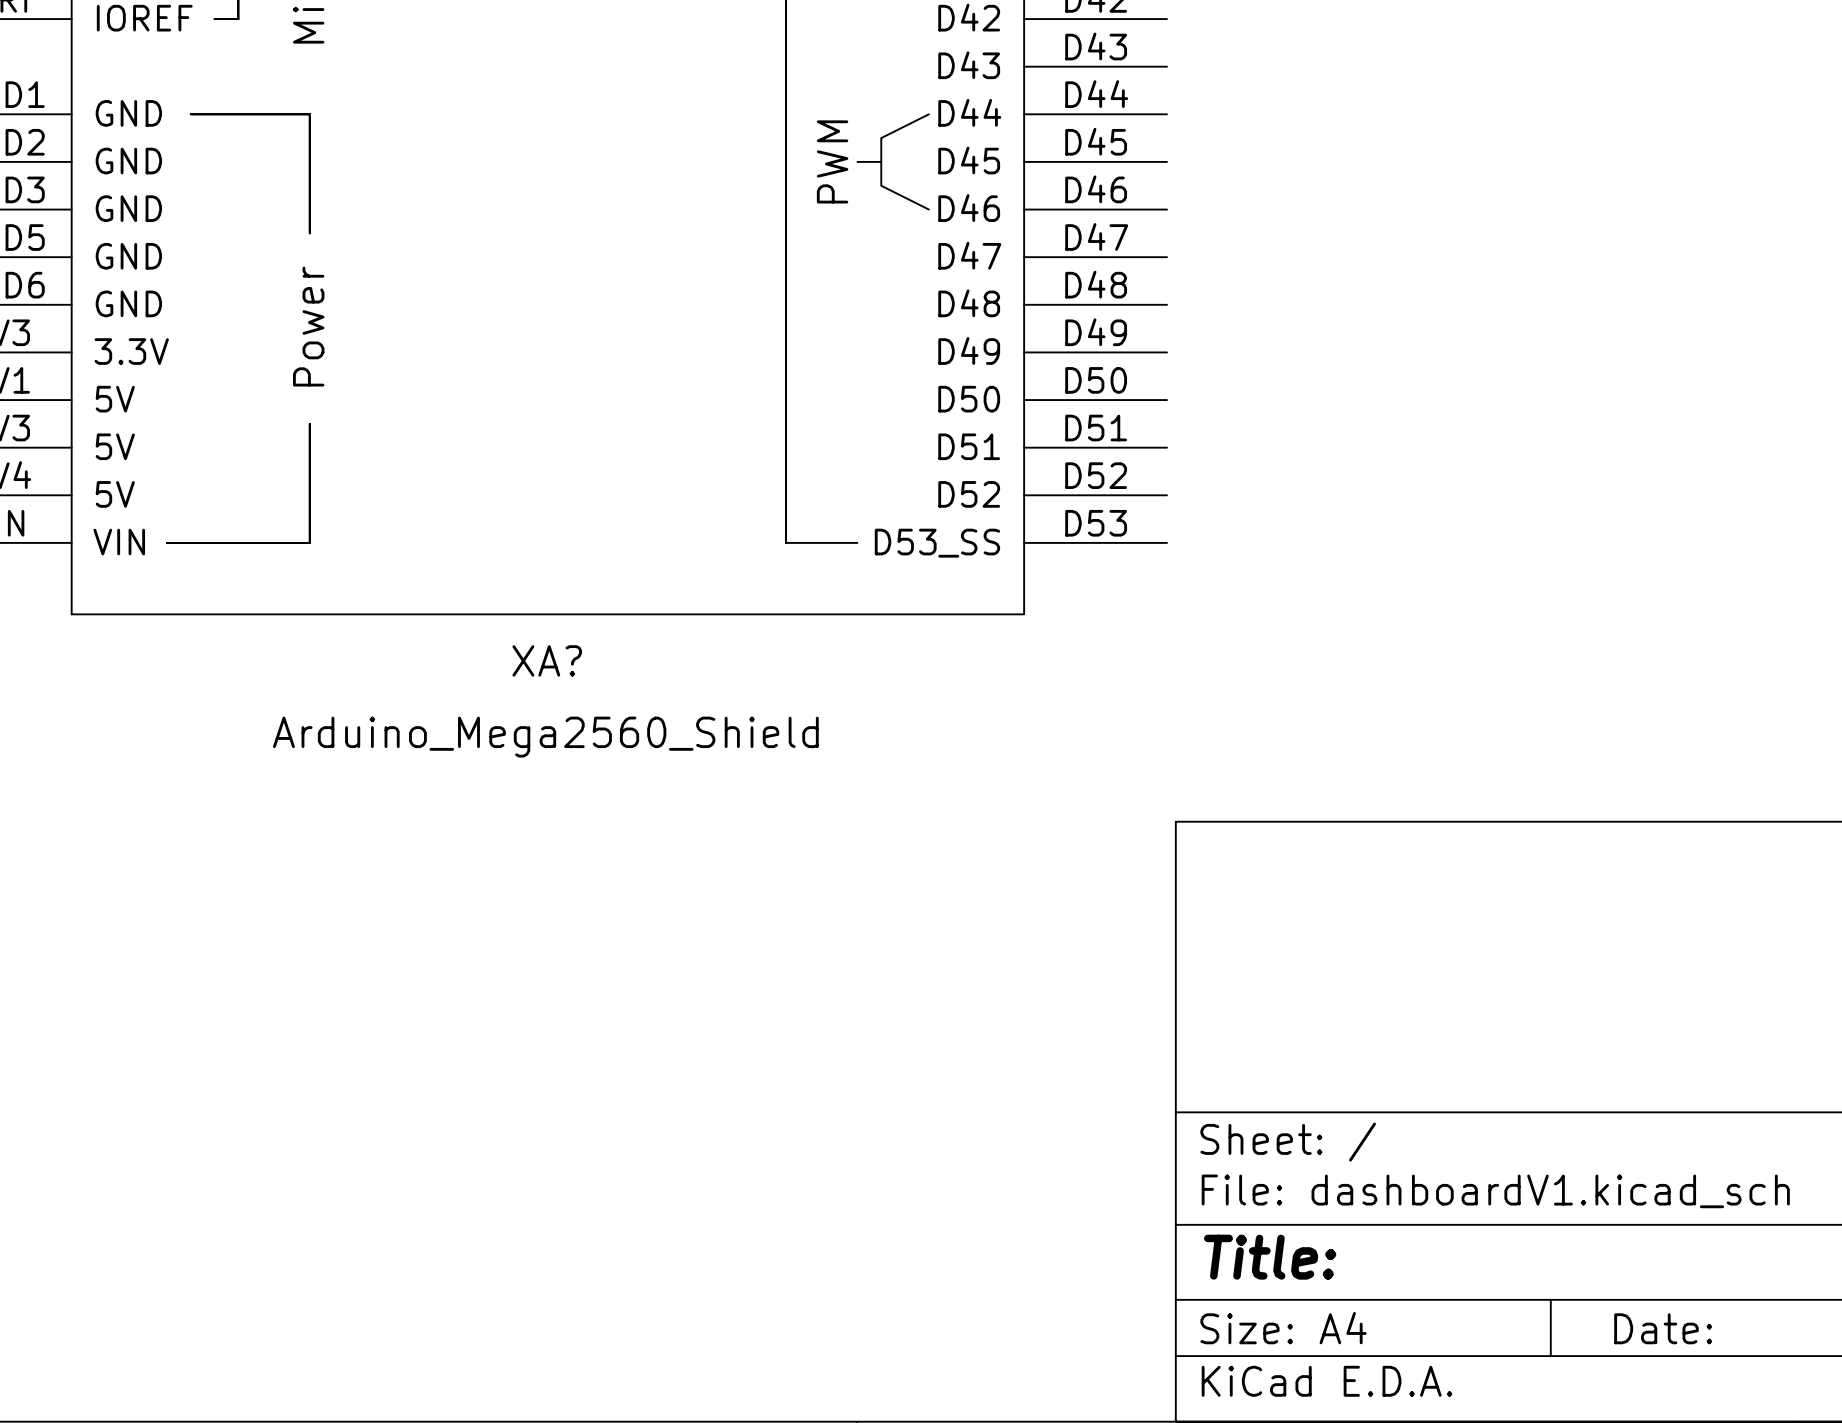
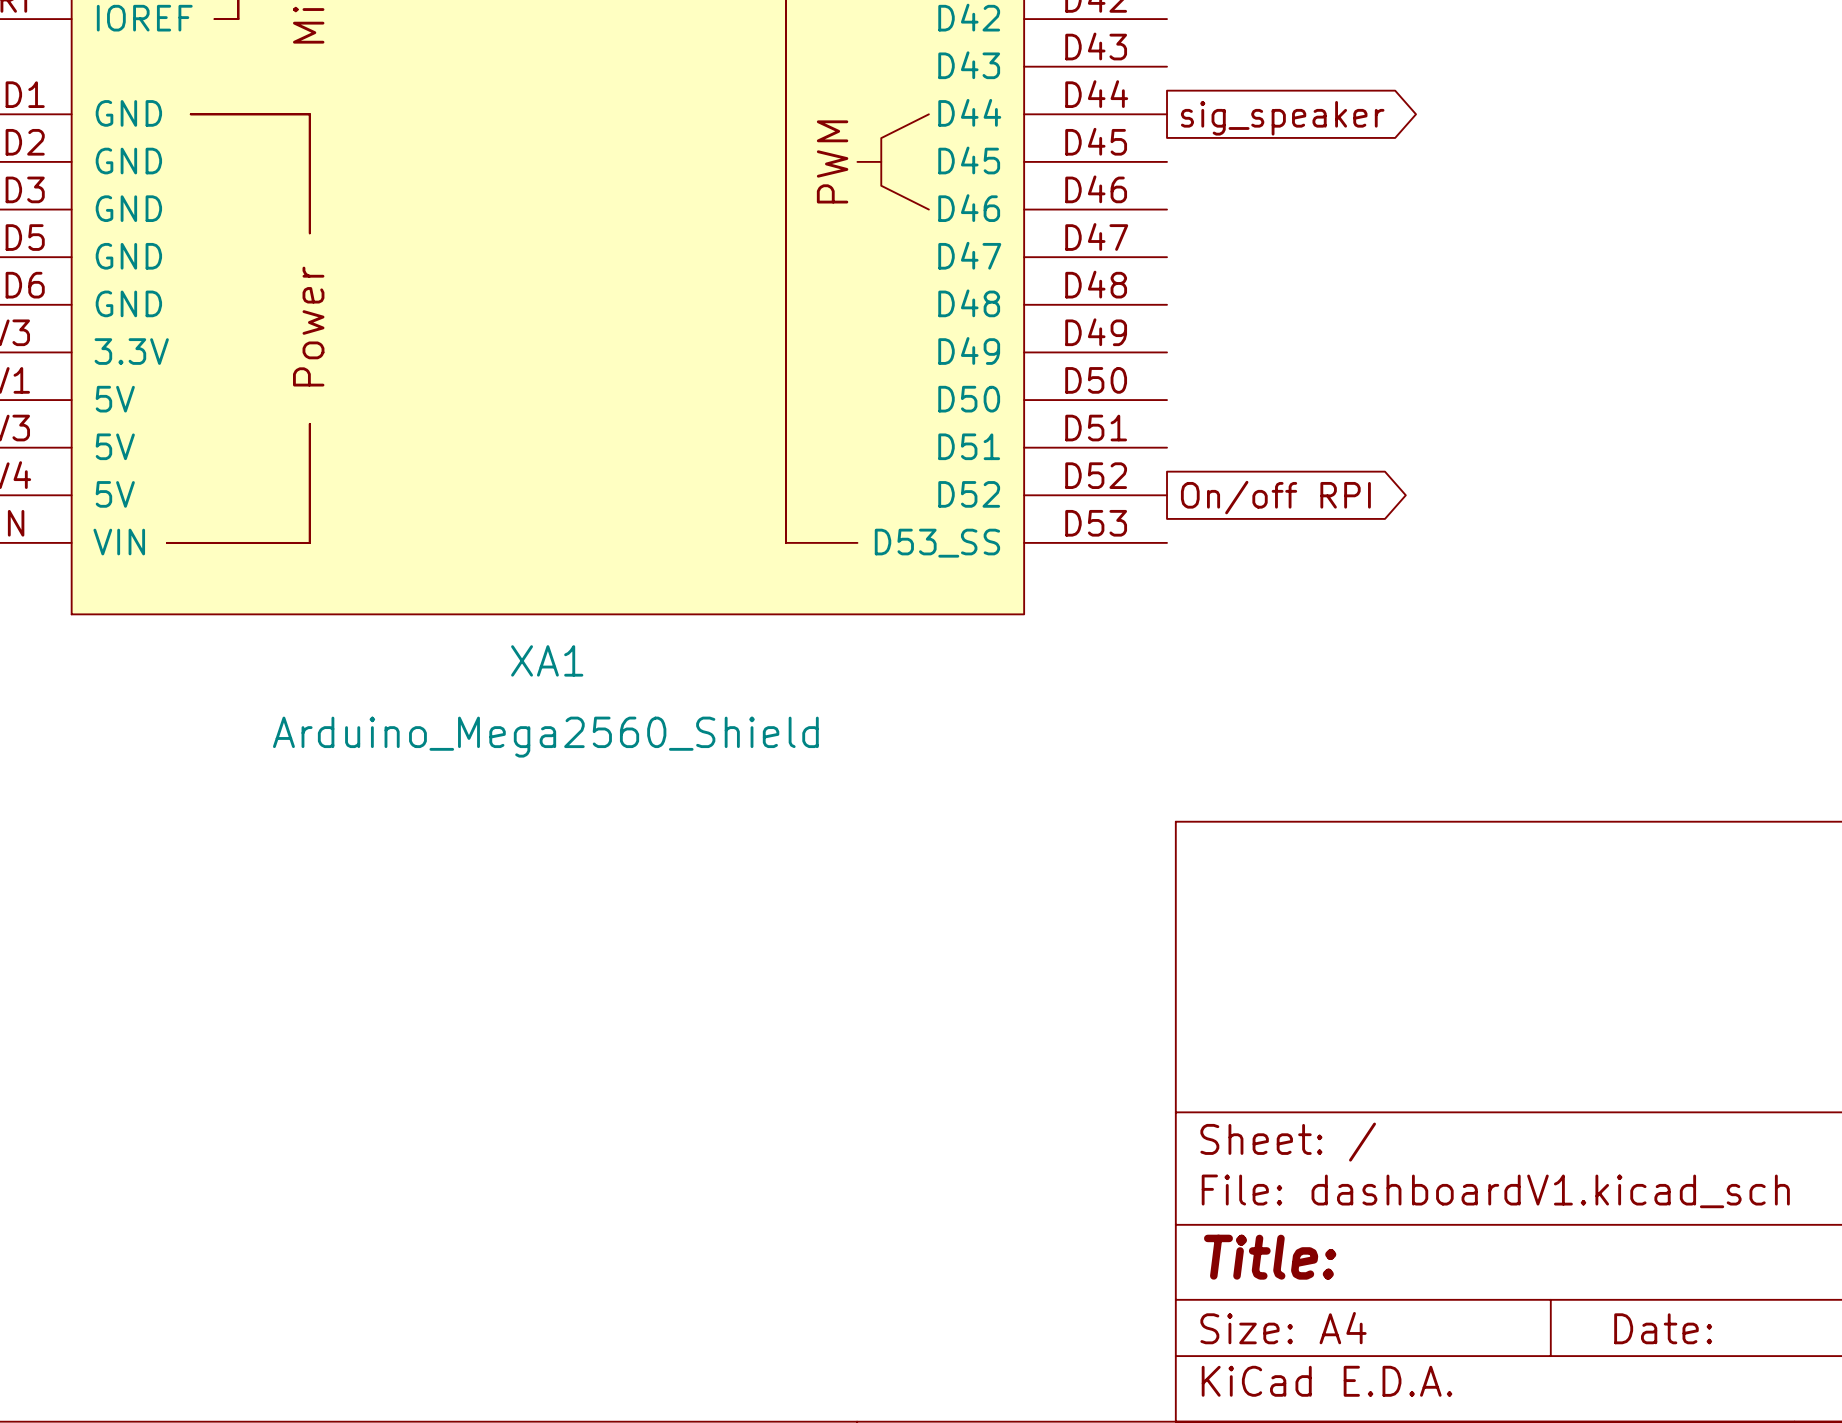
global label: none -> sig_speaker (1282, 118)
global label: none -> On/off RPI (1275, 497)
XA? name: XA? (547, 660) -> XA1 (547, 660)

